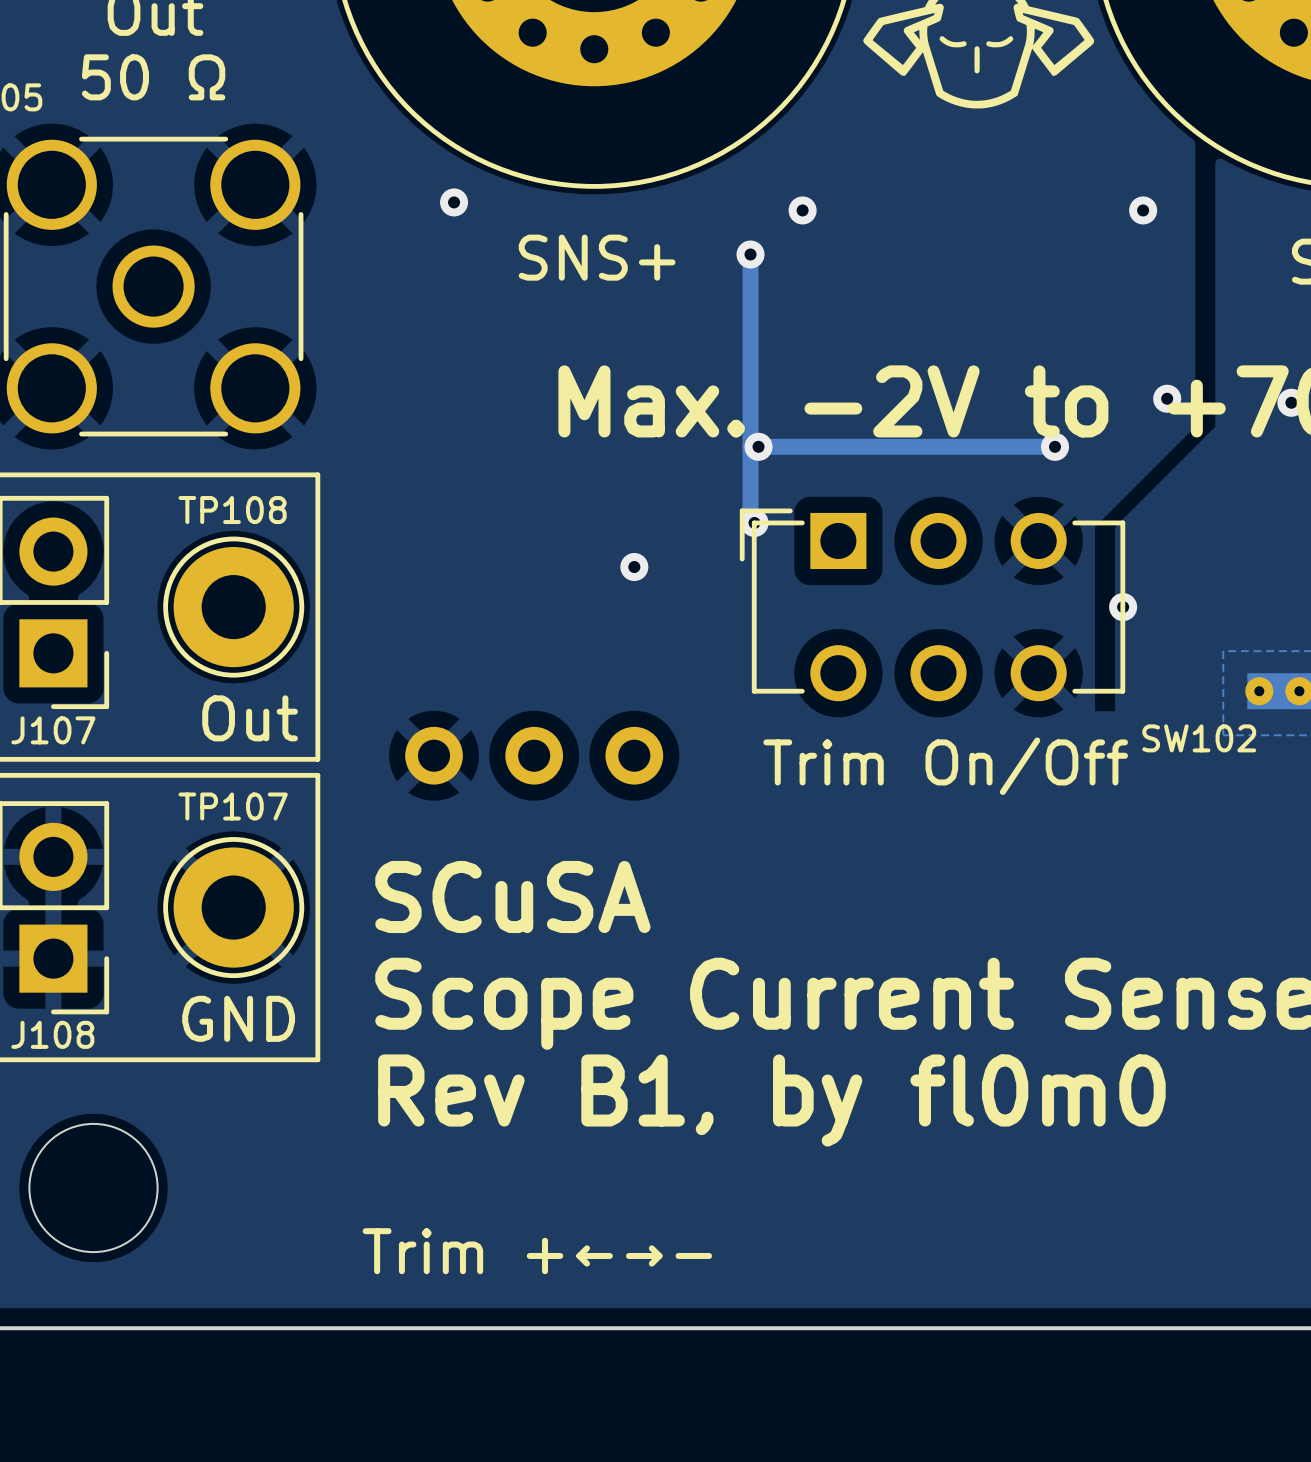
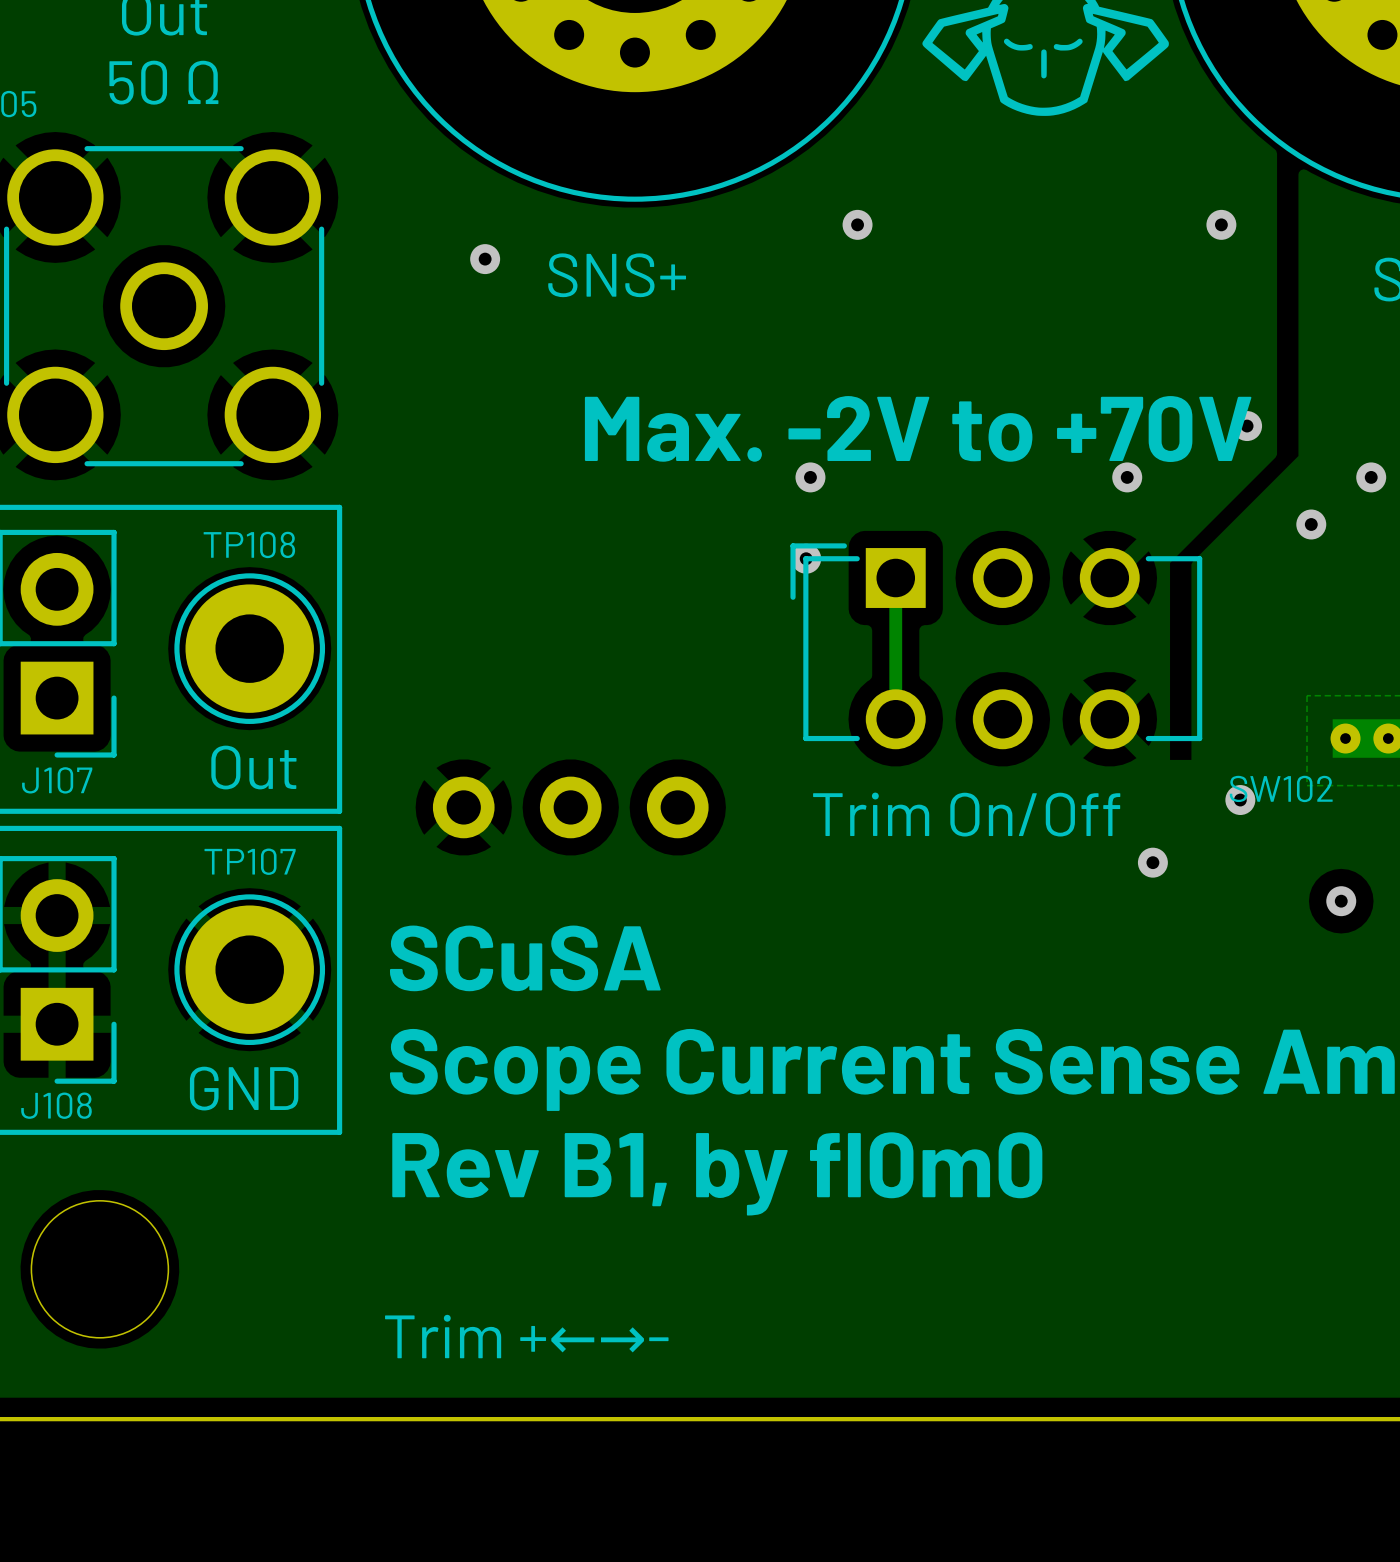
via position: (454, 202) -> (485, 259)
track: (750, 254) (750, 518) -> none
via: (750, 254) -> none
via position: (1291, 402) -> (1371, 477)
track: (1055, 446) (750, 446) -> none
via: none -> (1311, 524)
track: none -> (895, 578) (895, 719)
via: (634, 567) -> none
via: (1123, 607) -> none
via: none -> (1240, 800)
via: none -> (1152, 862)
via: none -> (1341, 901)

